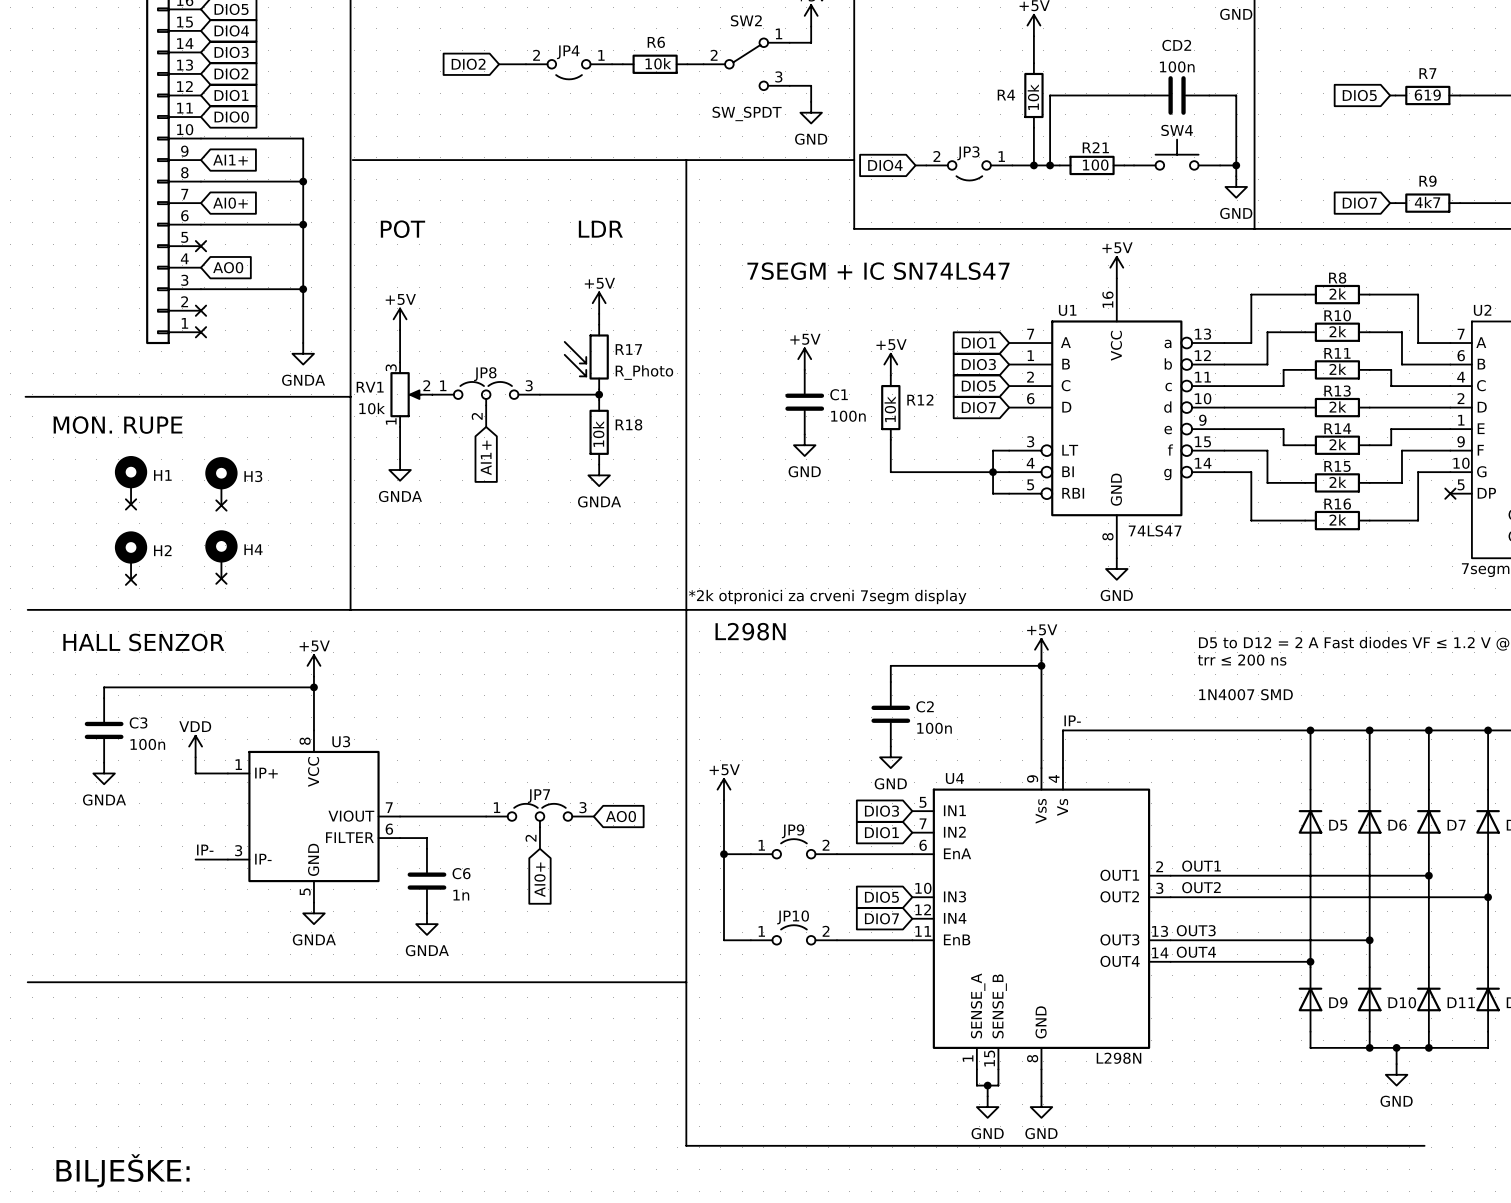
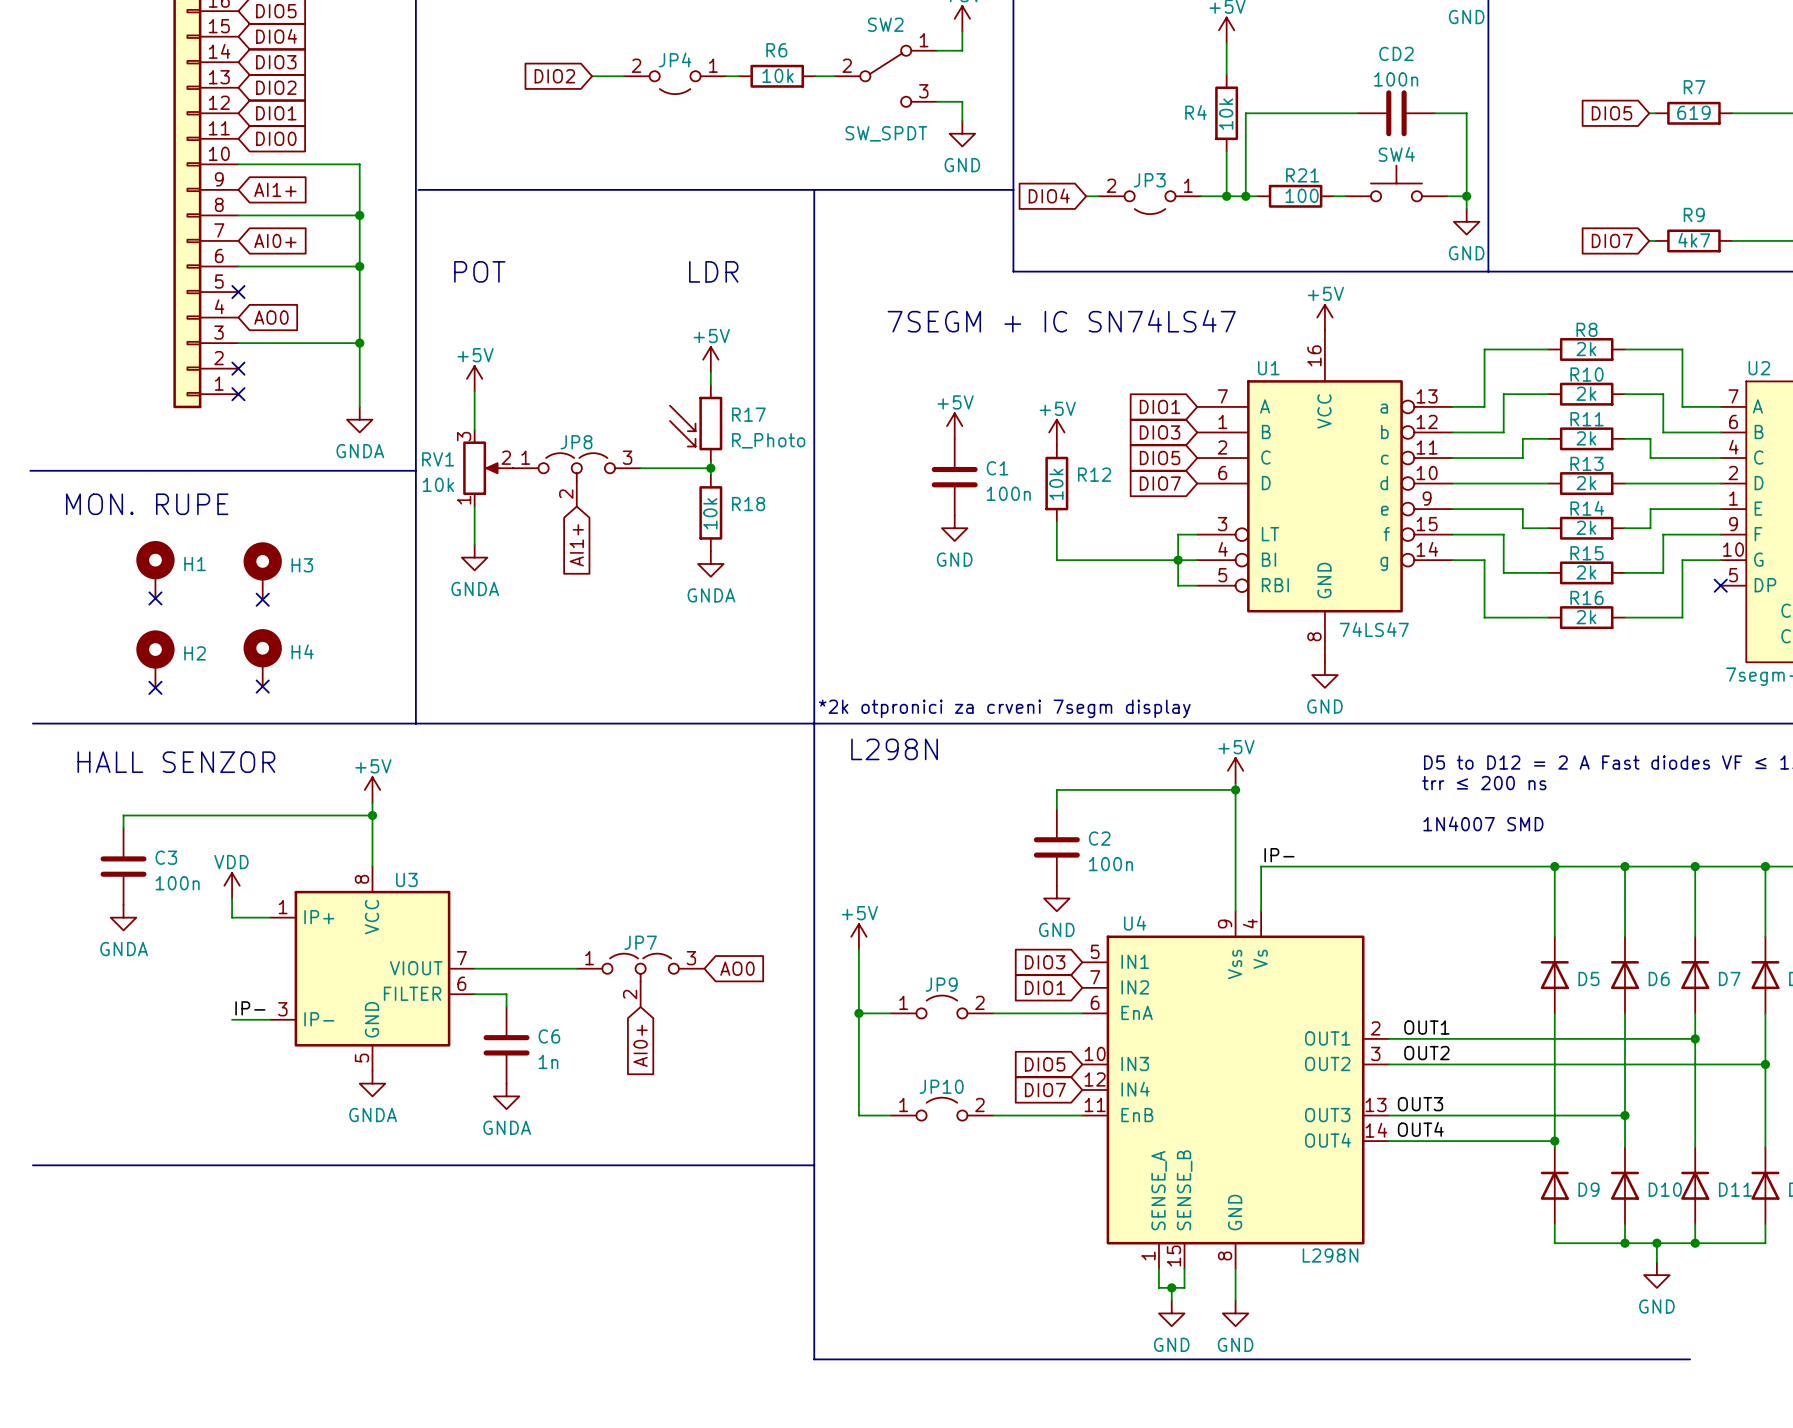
text: BILJEŠKE: (123, 1170) -> none

